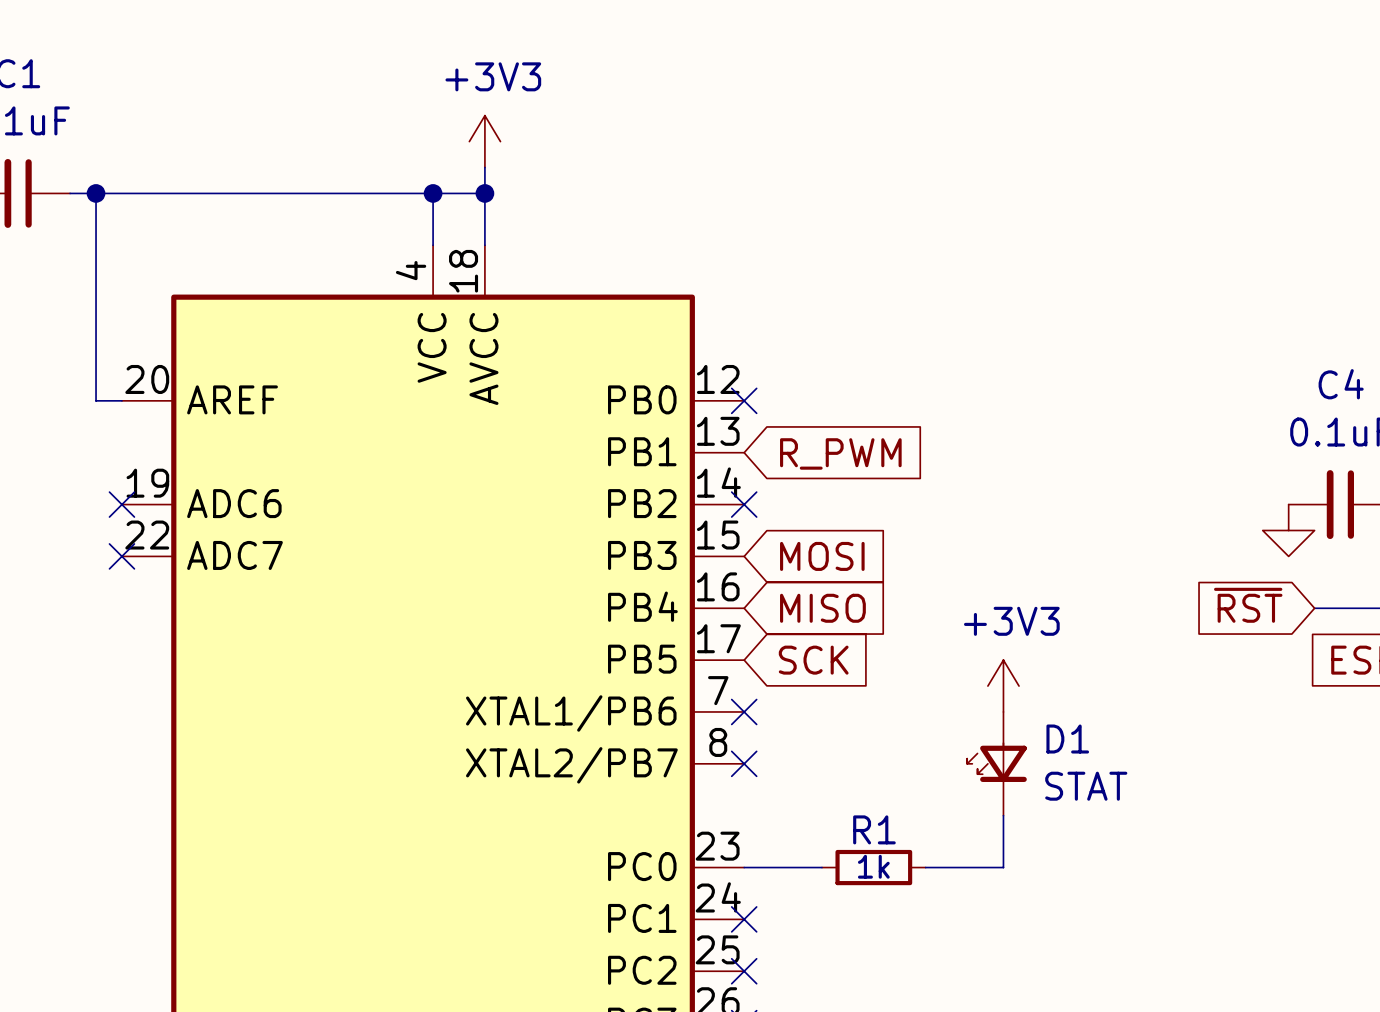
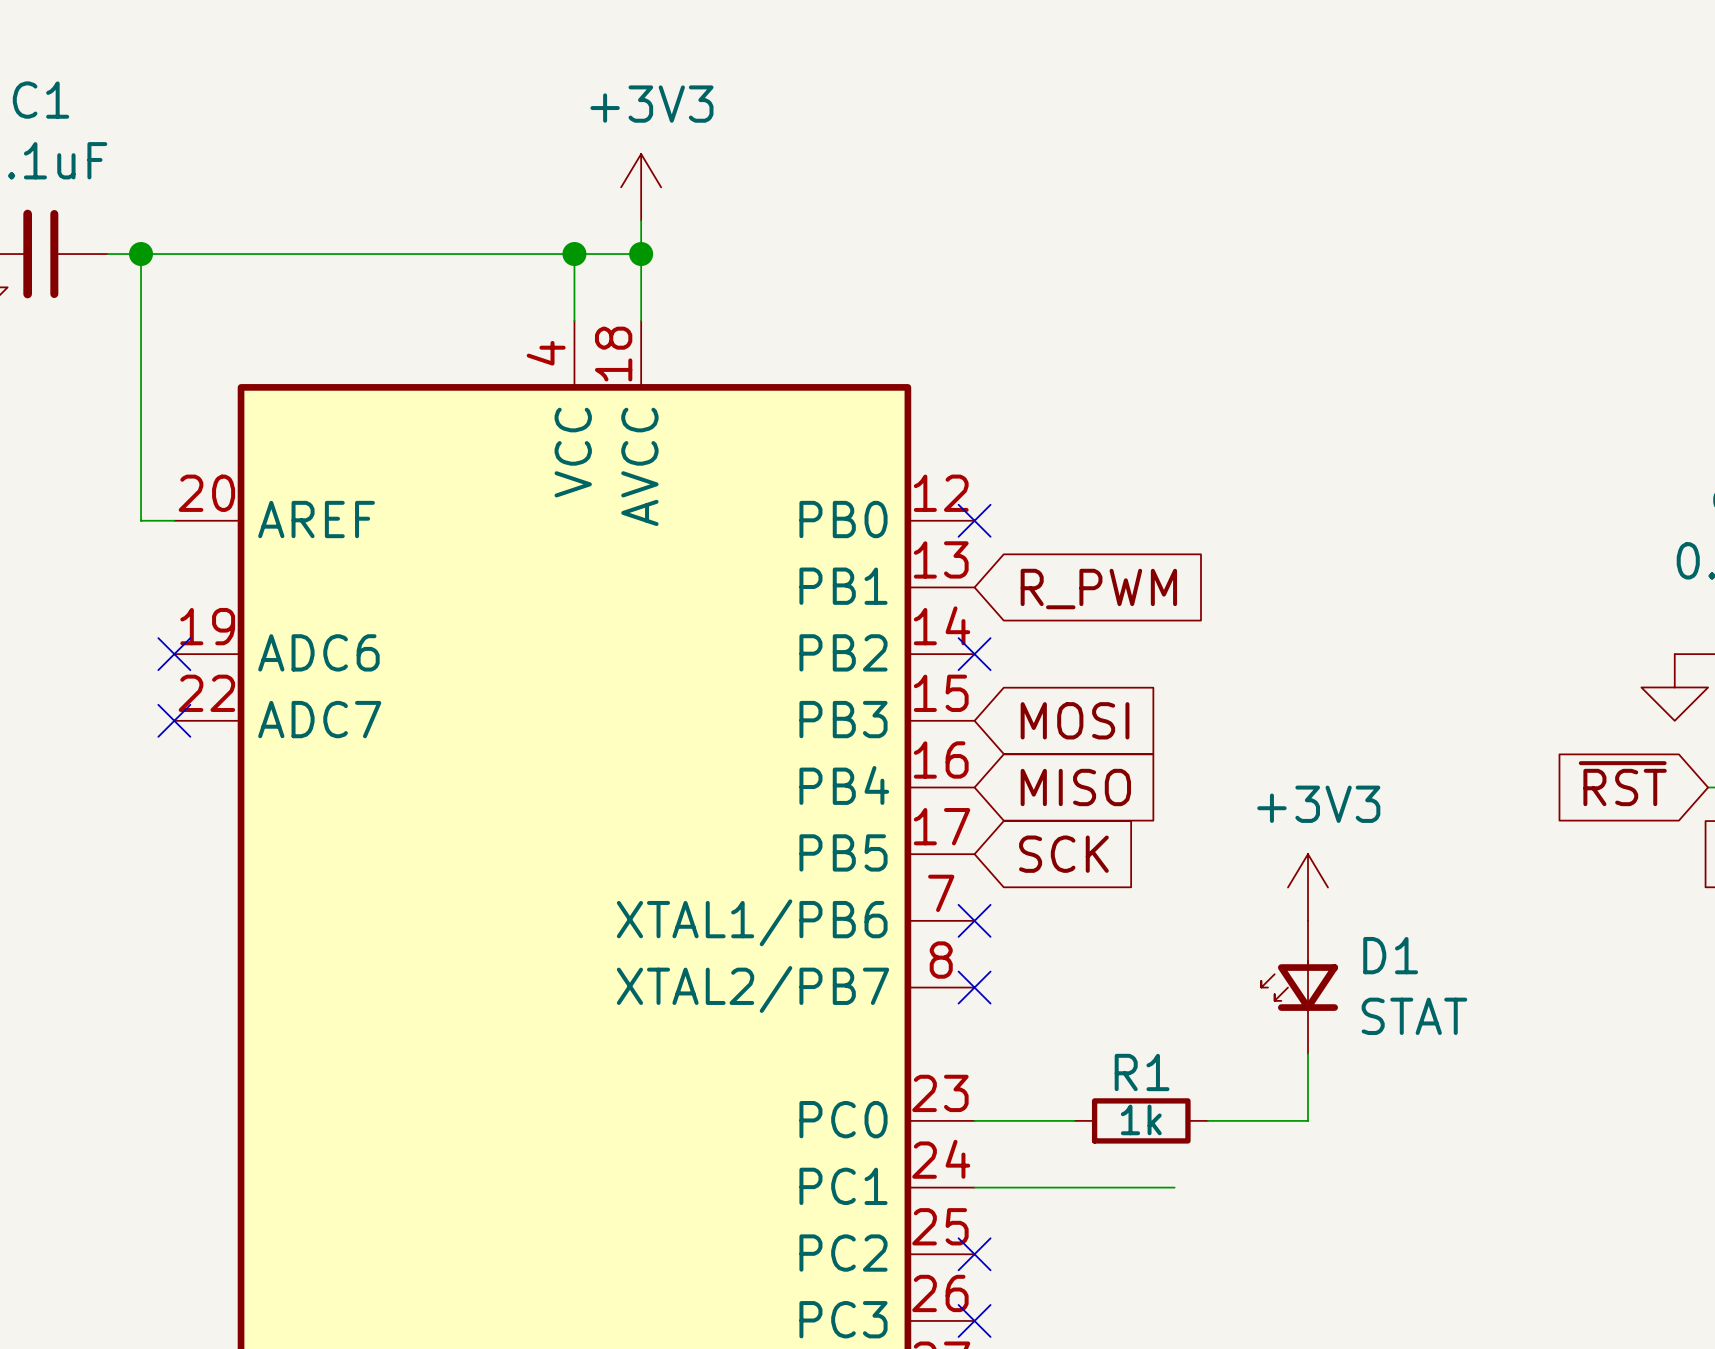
wire: none -> (974, 1187) (1174, 1187)
no-connect mark: (744, 919) -> none

